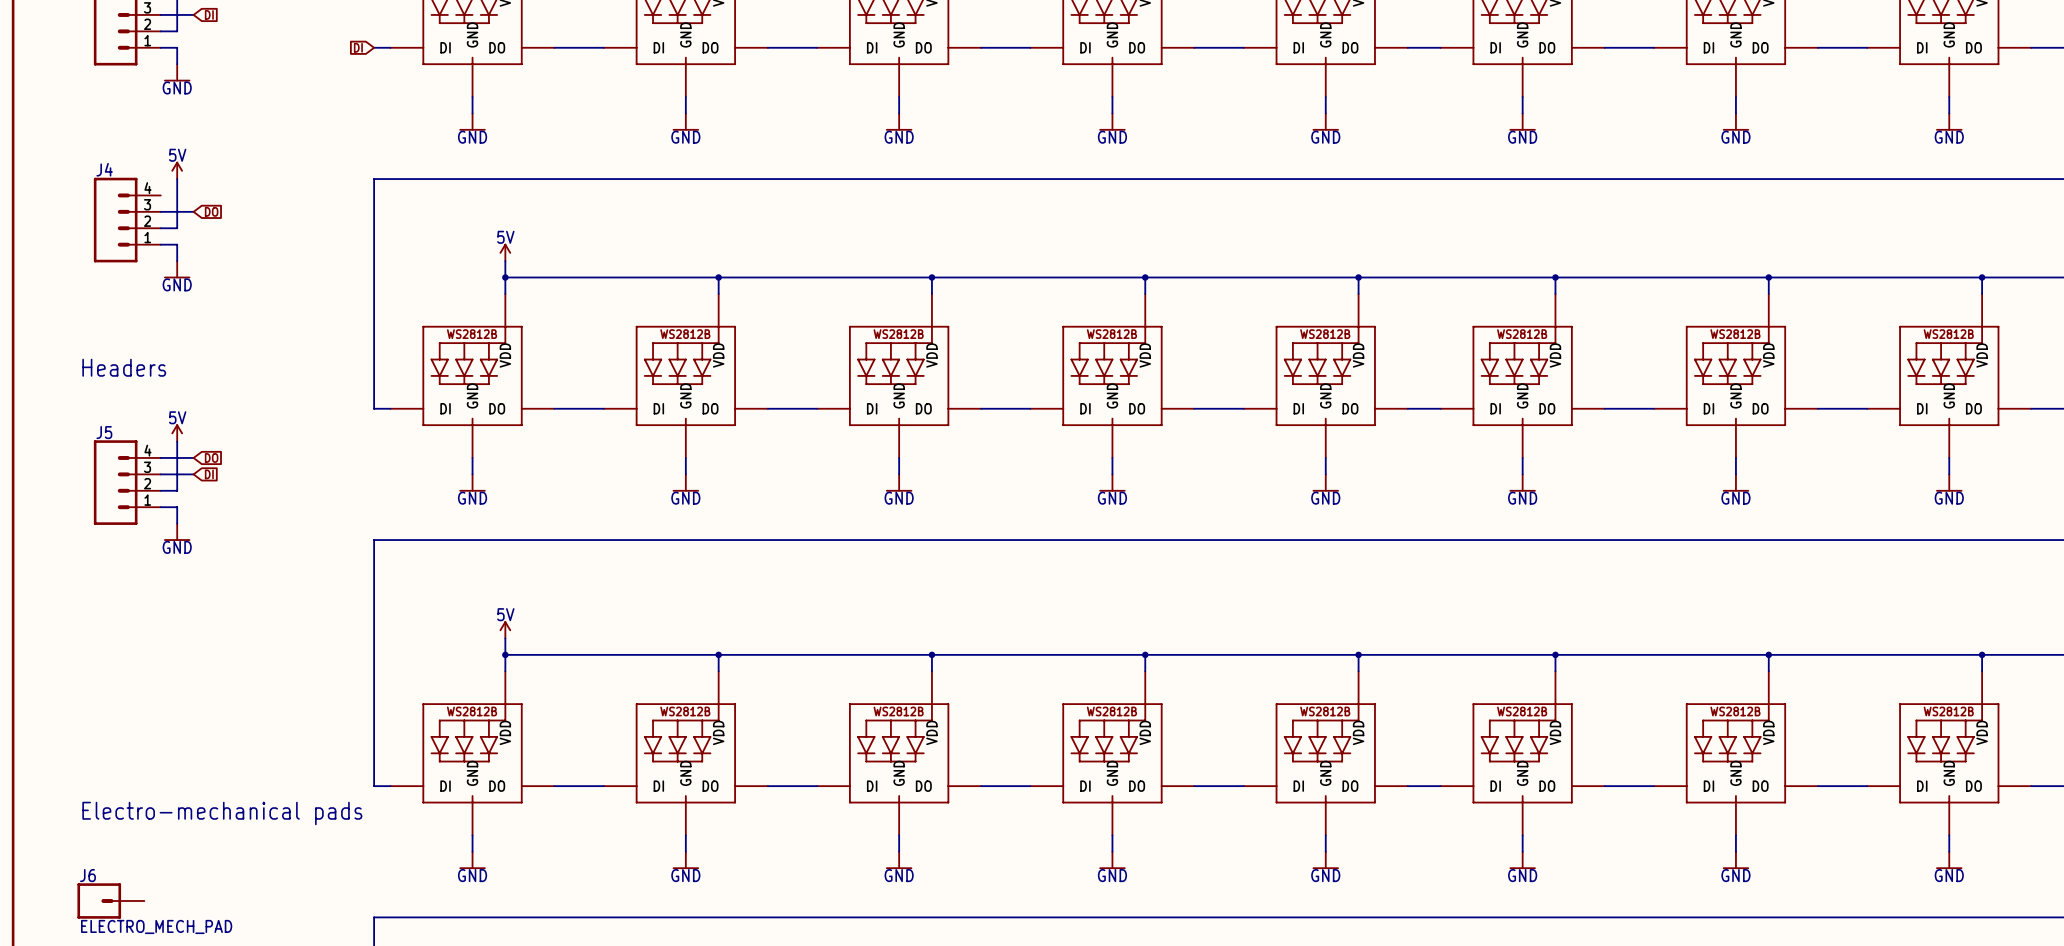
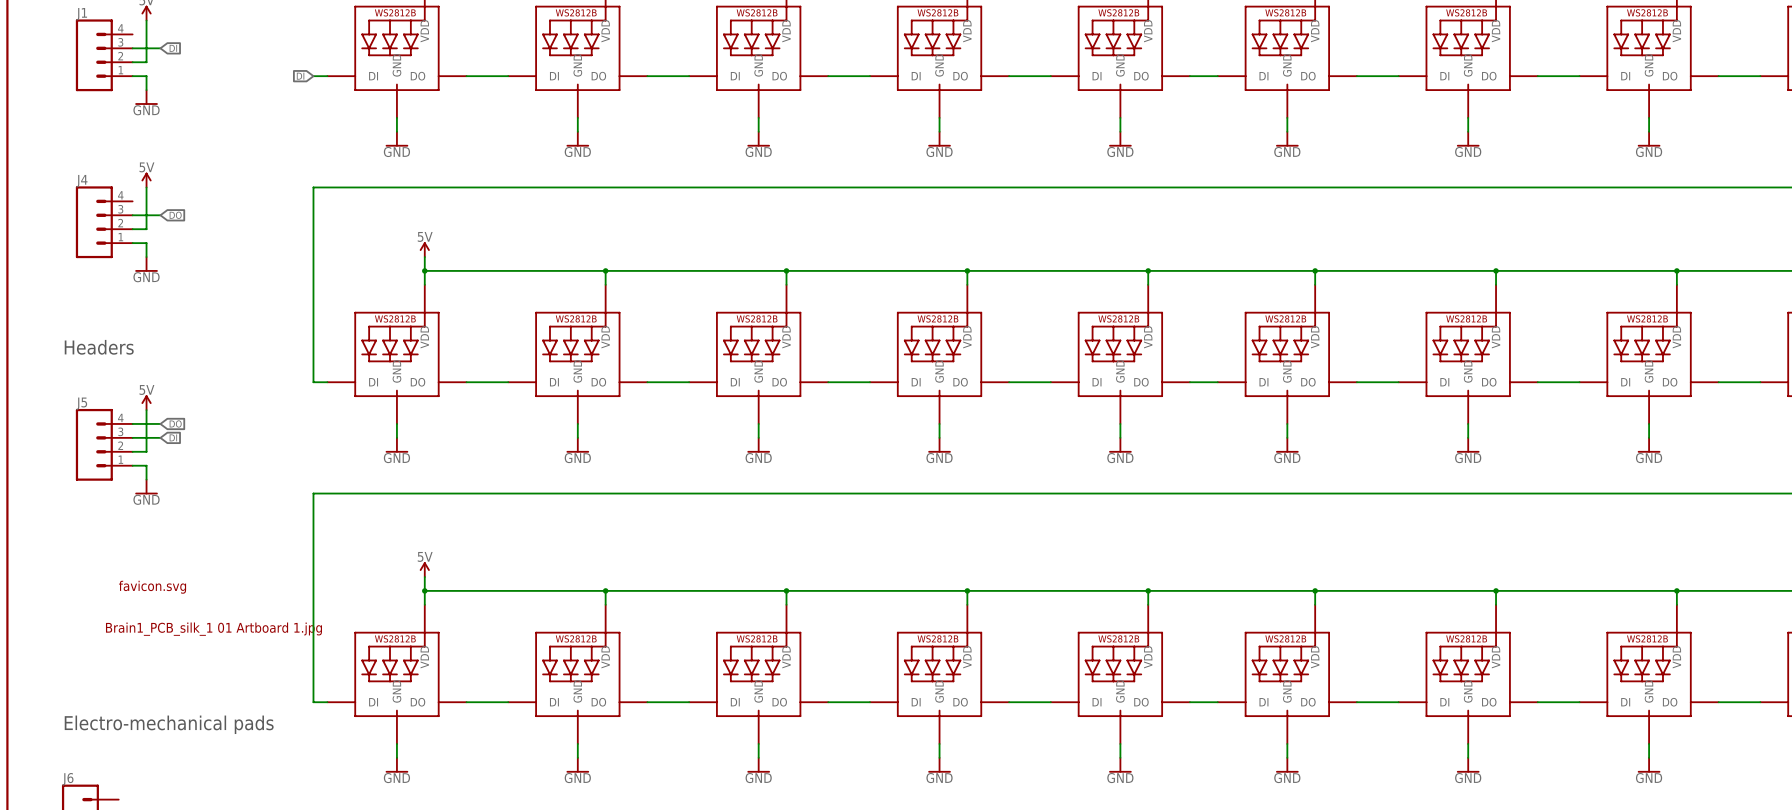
part: none -> (152, 587)
part: none -> (213, 629)

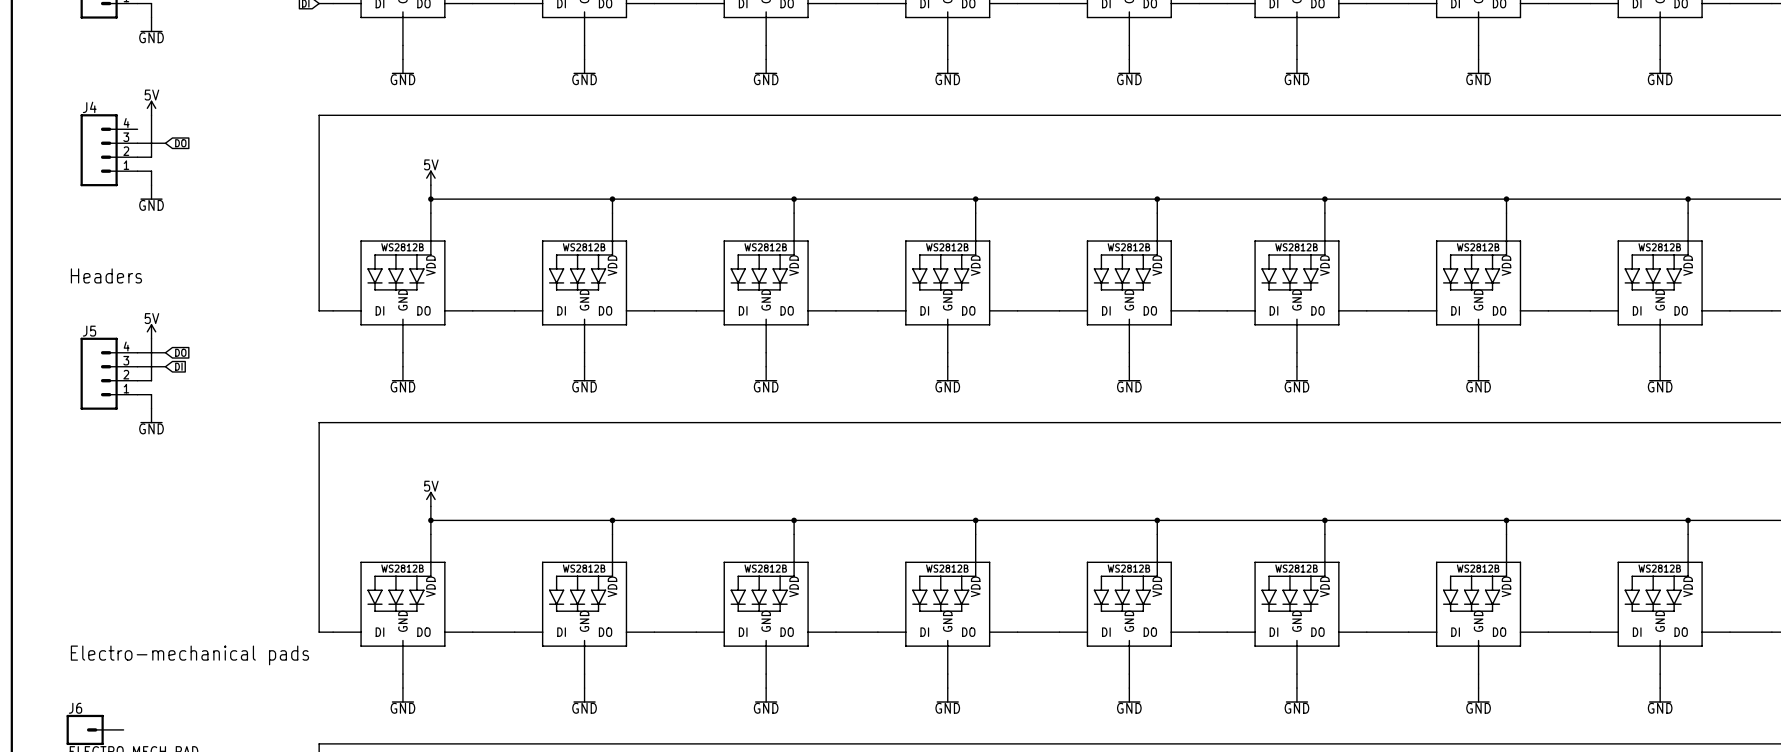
part: (152, 587) -> none
part: (213, 629) -> none

